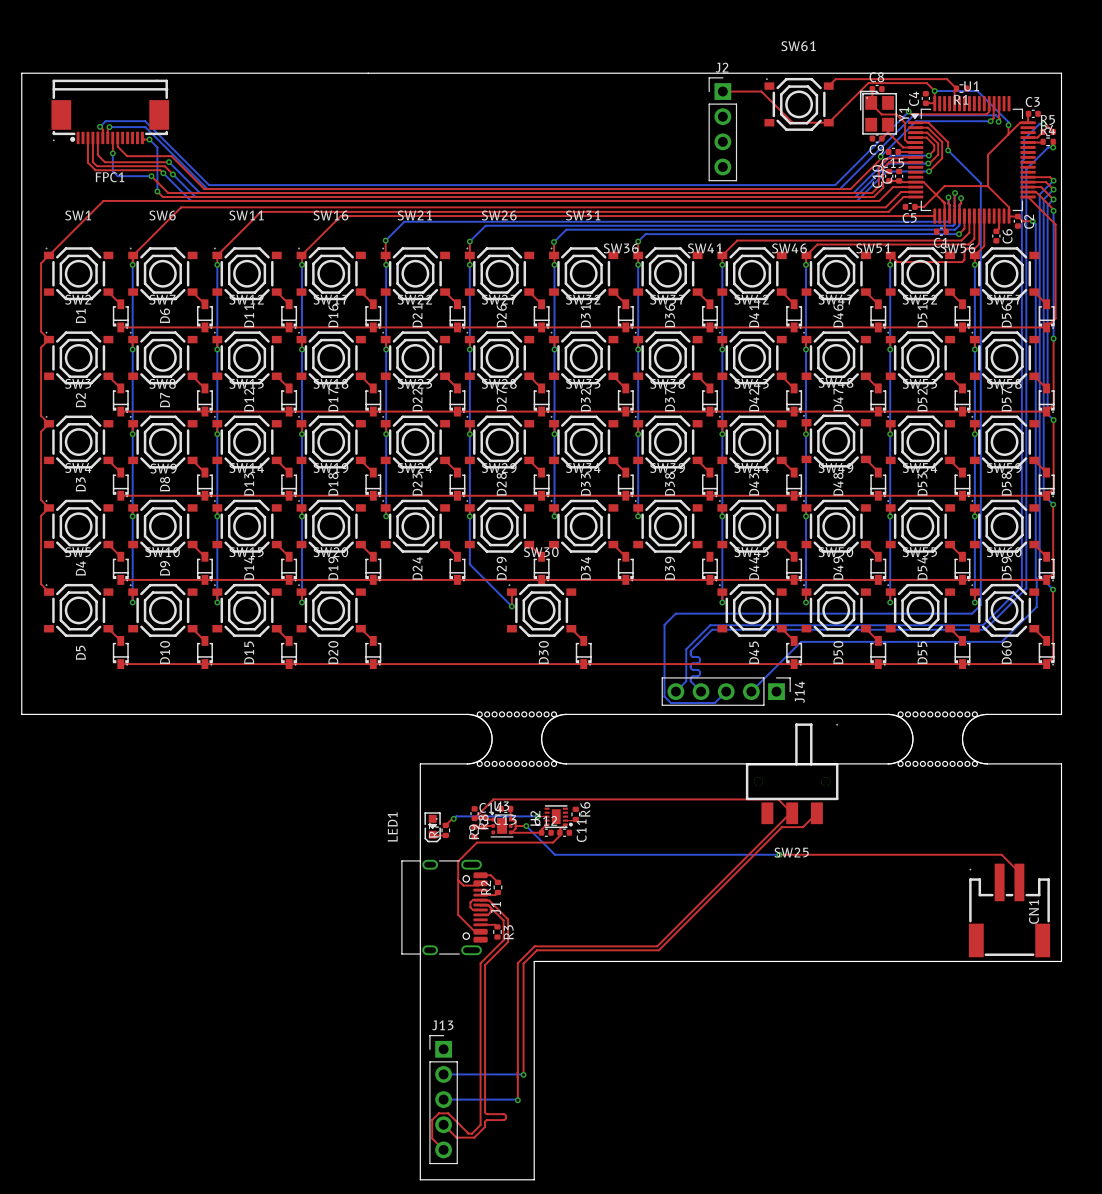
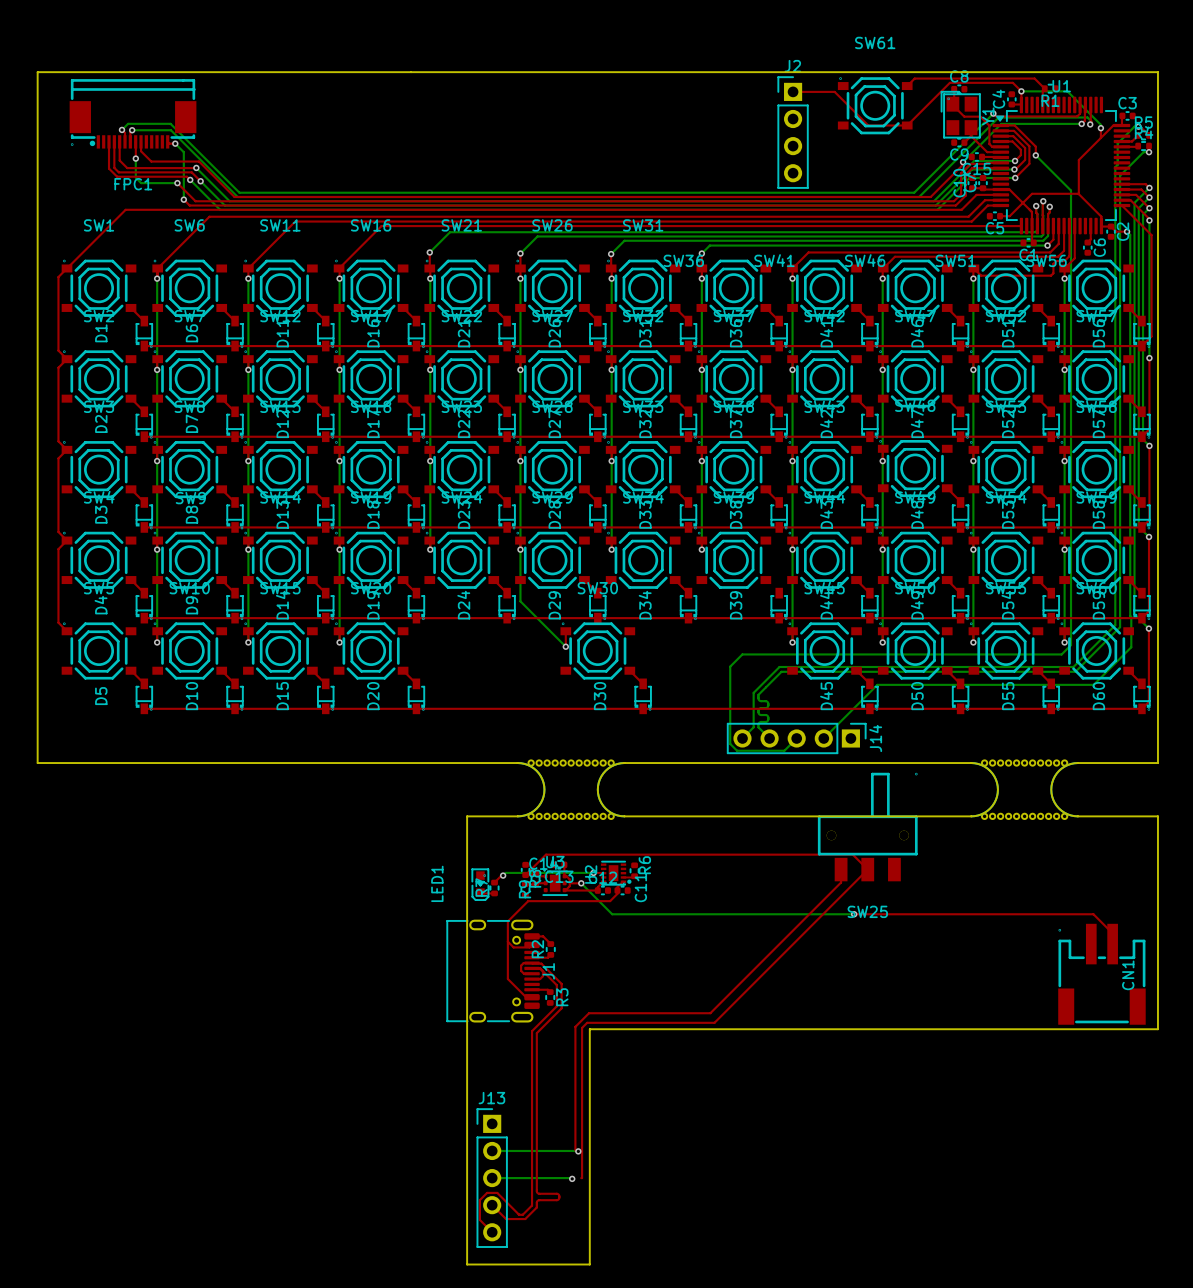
top track: none -> (841, 869) (841, 882) (710, 1013) (589, 1013) (575, 1026) (575, 1150)
top track: (792, 813) (657, 946) (534, 946) (517, 963) (517, 1100) -> none
top track: (816, 813) (803, 827) (782, 827) (658, 950) (536, 950) (531, 955) -> (867, 869) (714, 1022) (587, 1022)
top track: (527, 960) (523, 963) (523, 1074) -> (582, 1027) (581, 1178)

